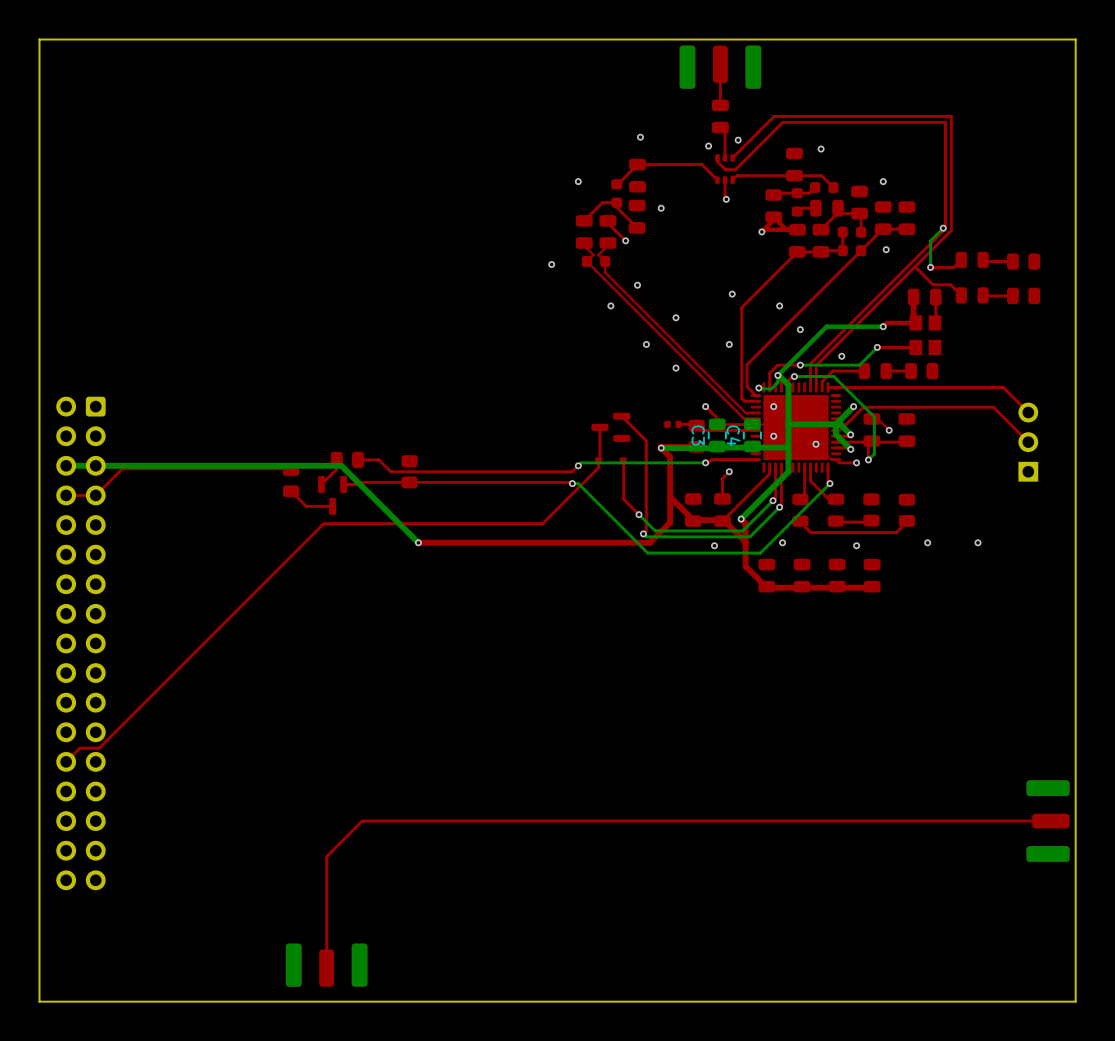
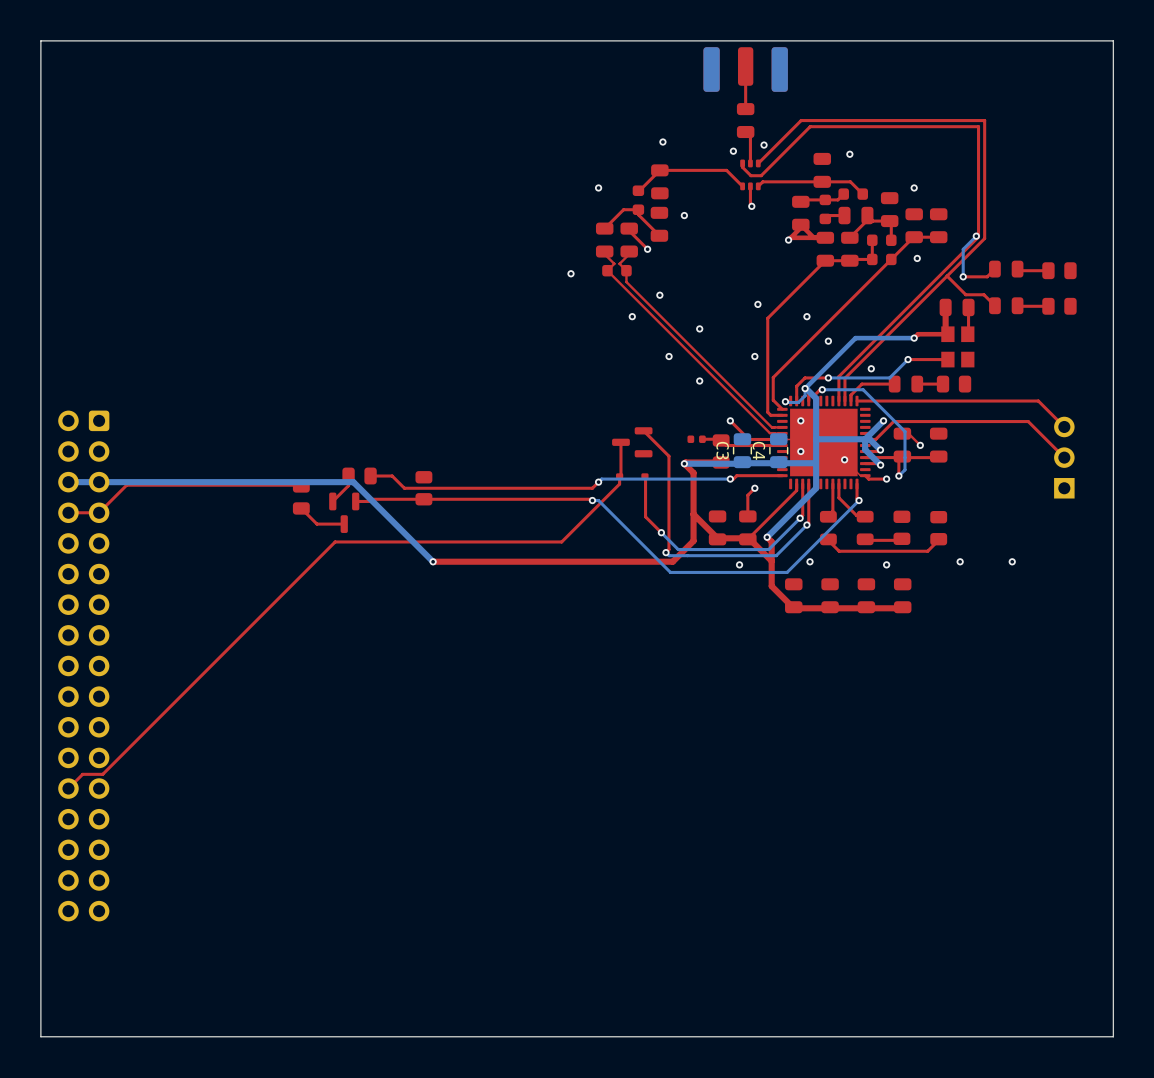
part: (1048, 821) -> none
top track: (1050, 821) (362, 821) (326, 856) (326, 968) -> none
part: (326, 965) -> none

